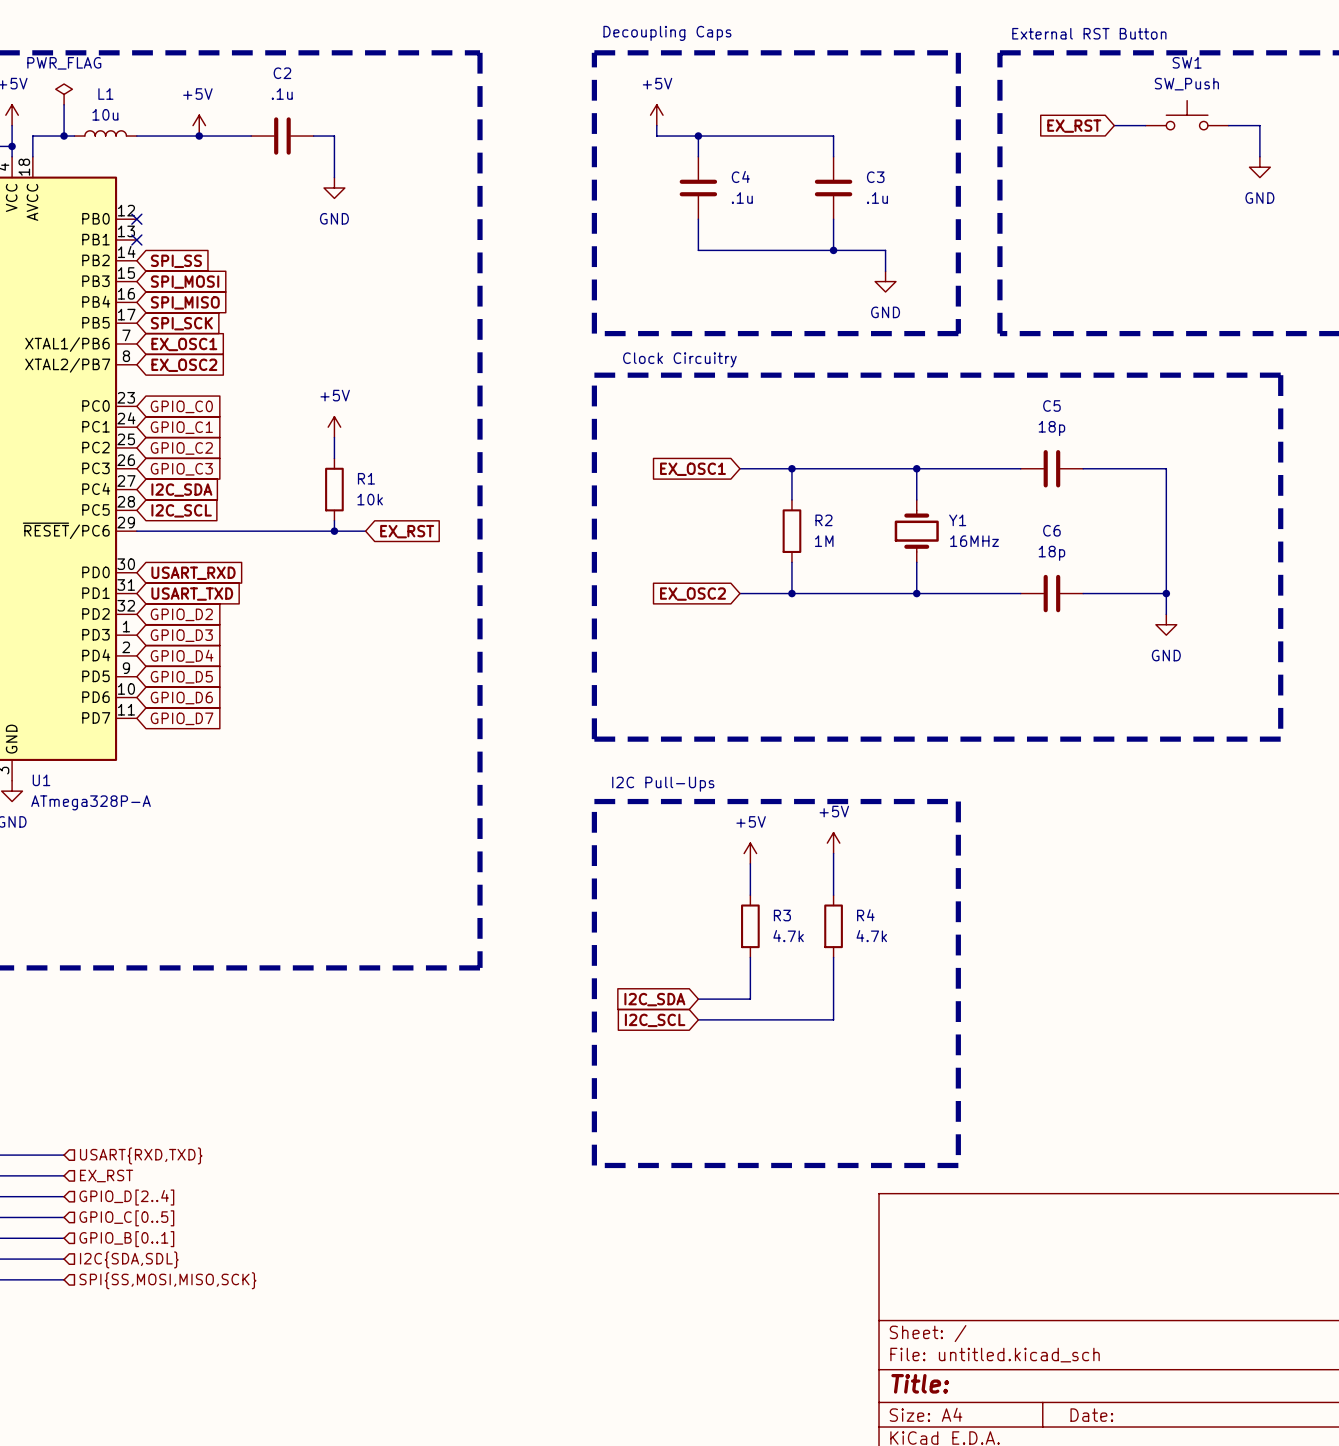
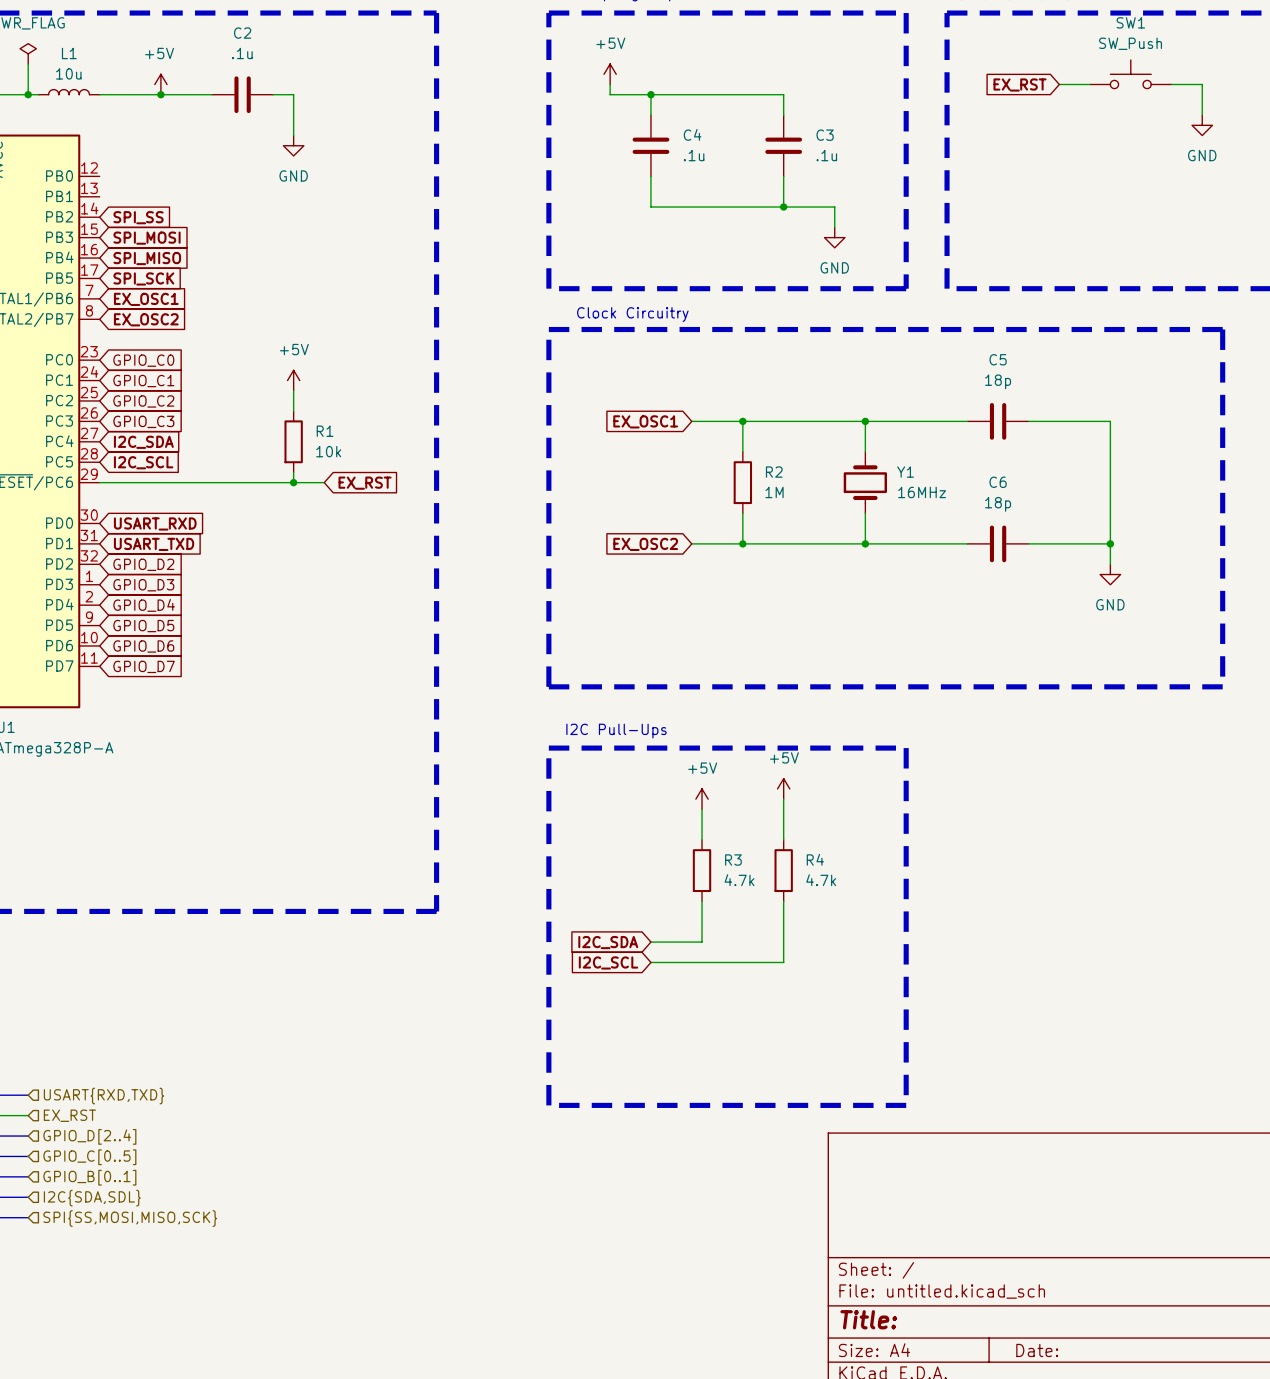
no-connect mark: (136, 219) -> none
no-connect mark: (136, 240) -> none

